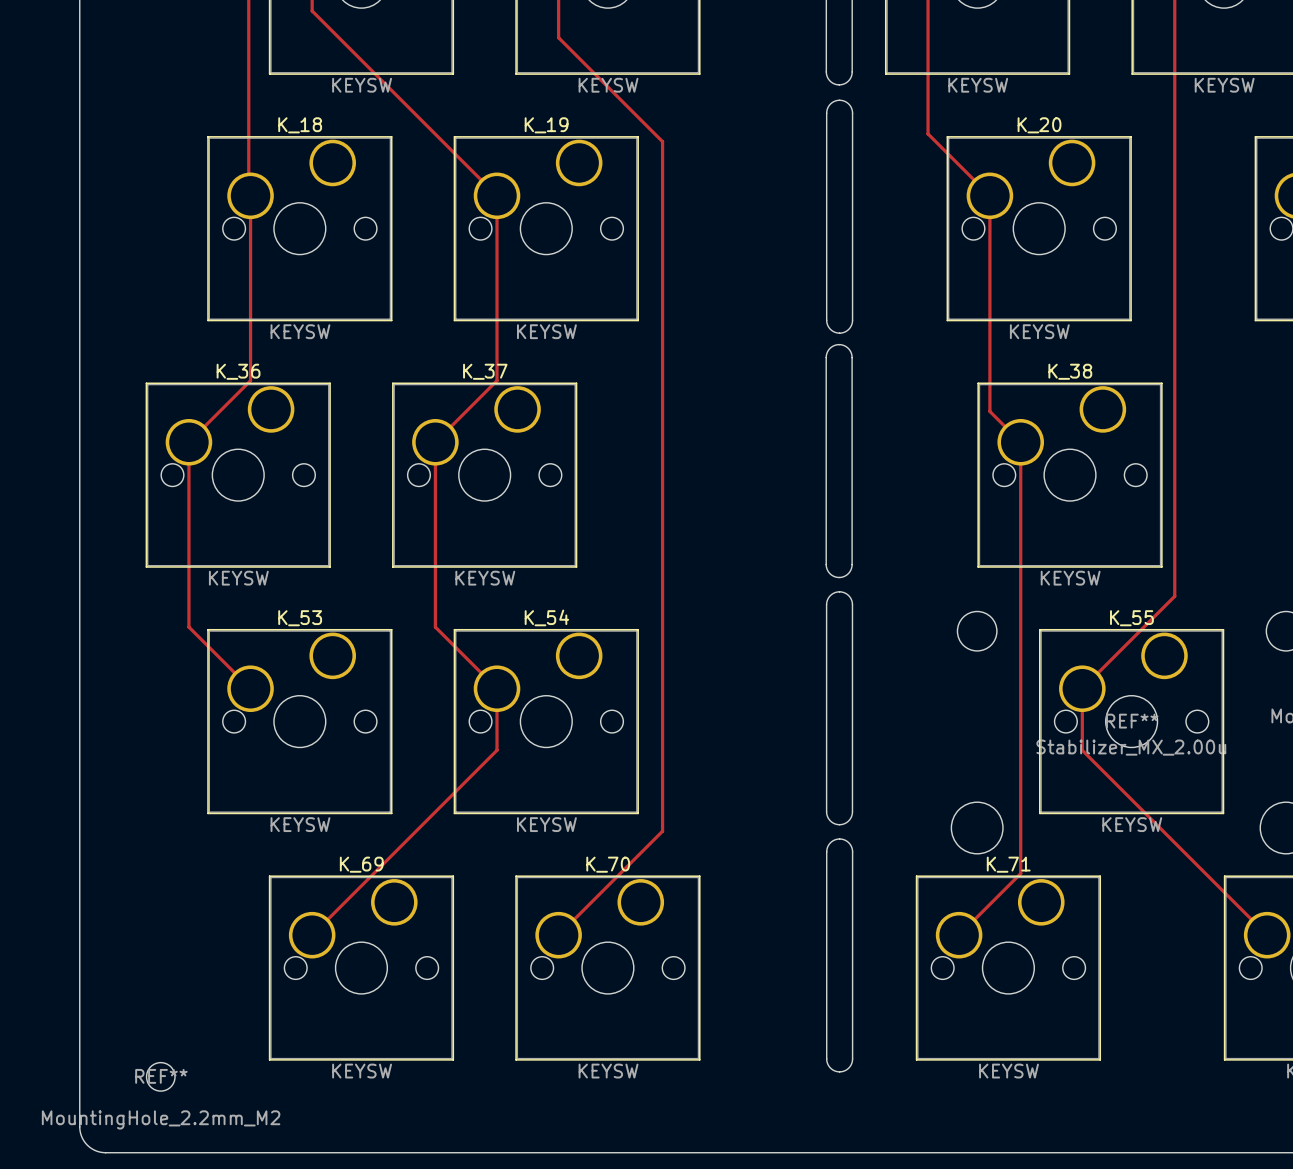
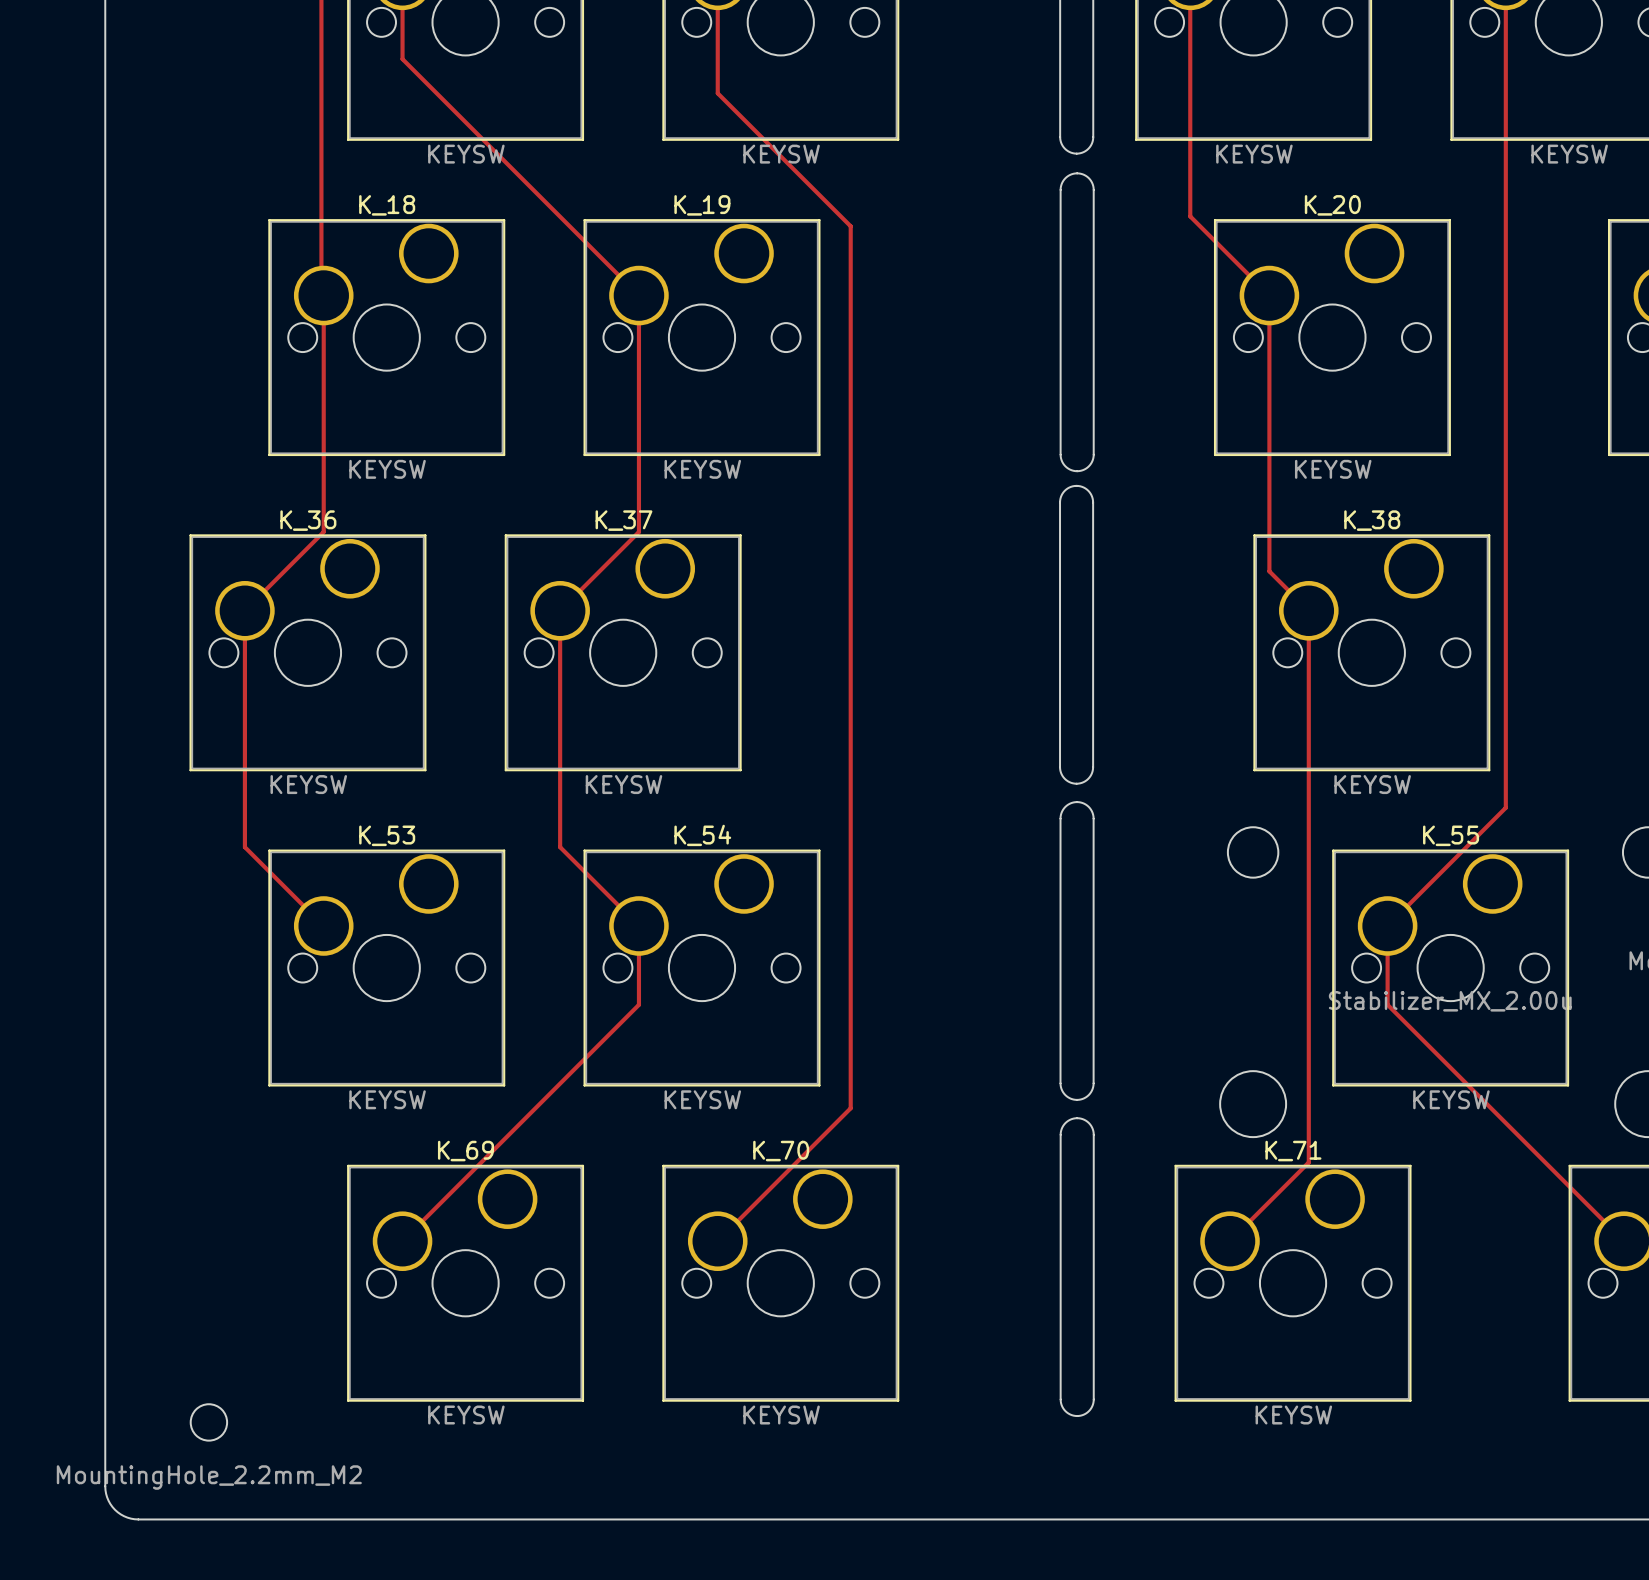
REF** name: REF** (1132, 721) -> none
REF** name: REF** (161, 1076) -> none

